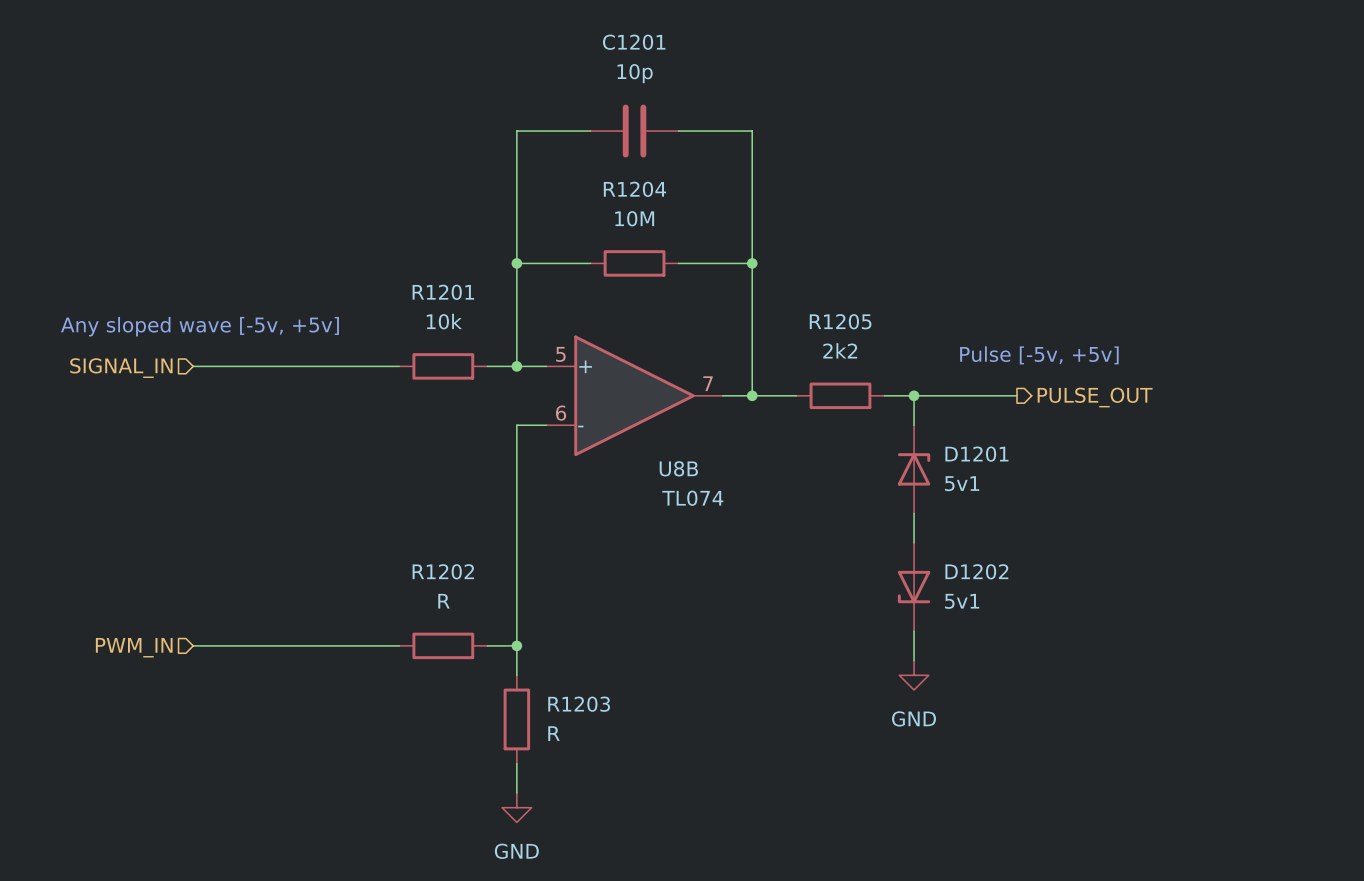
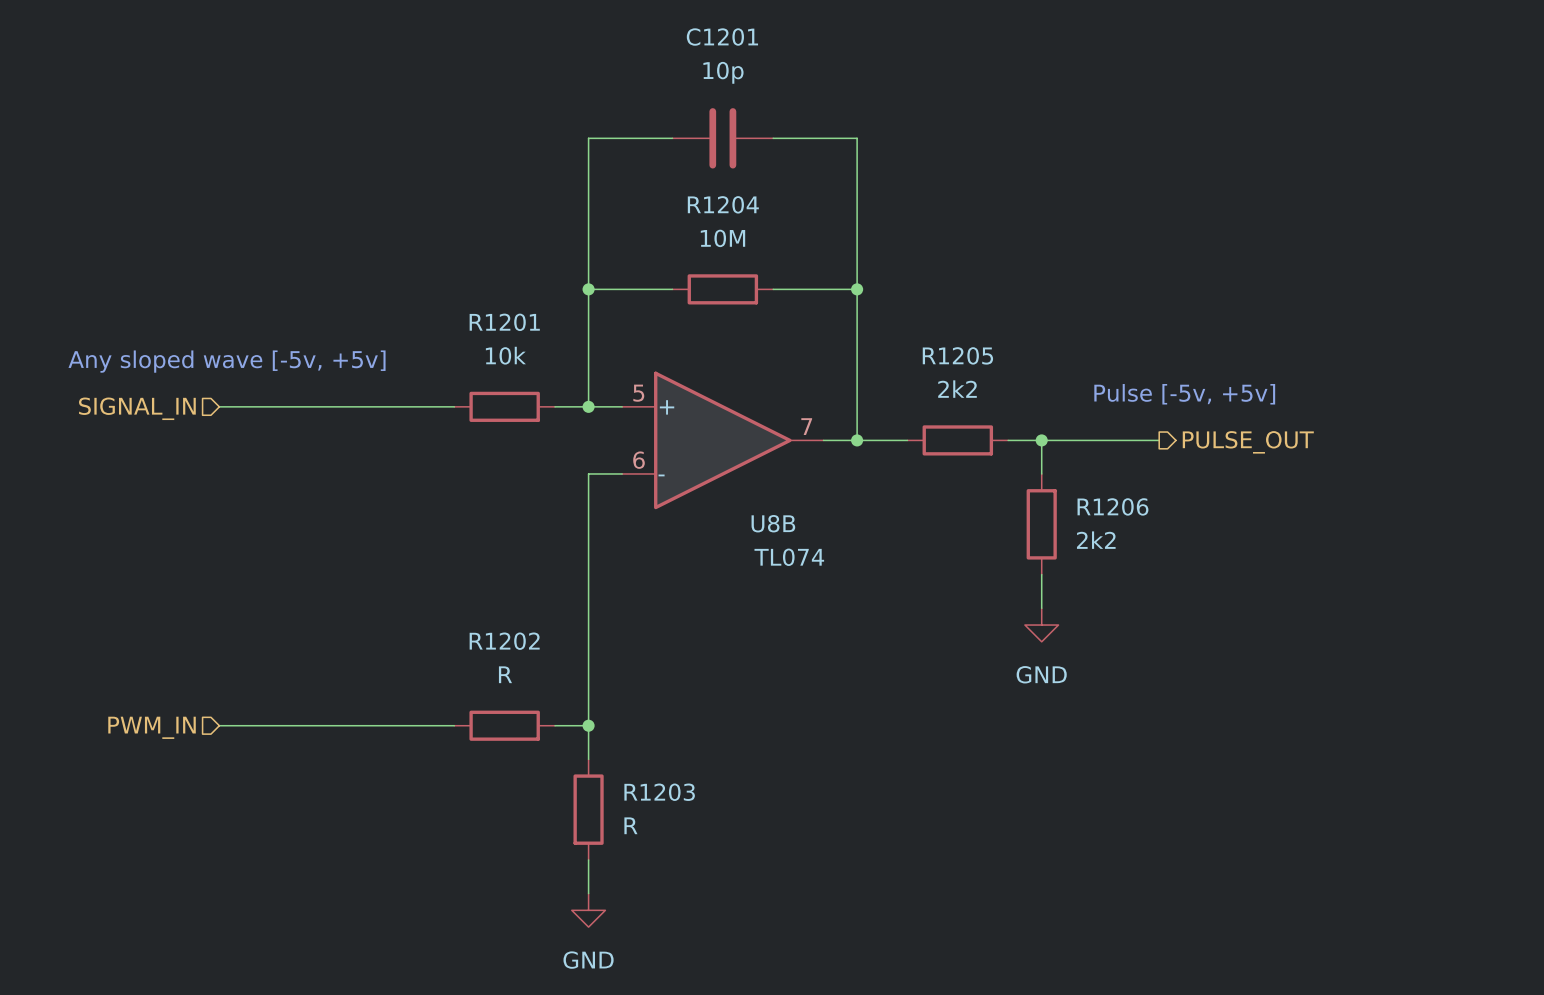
D1201: 5v1 (914, 469) -> none
R1206: none -> 2k2 (1041, 524)
D1202: 5v1 (914, 587) -> none
wire: (914, 631) (914, 660) -> none
power symbol position: GND (914, 675) -> GND (1041, 625)

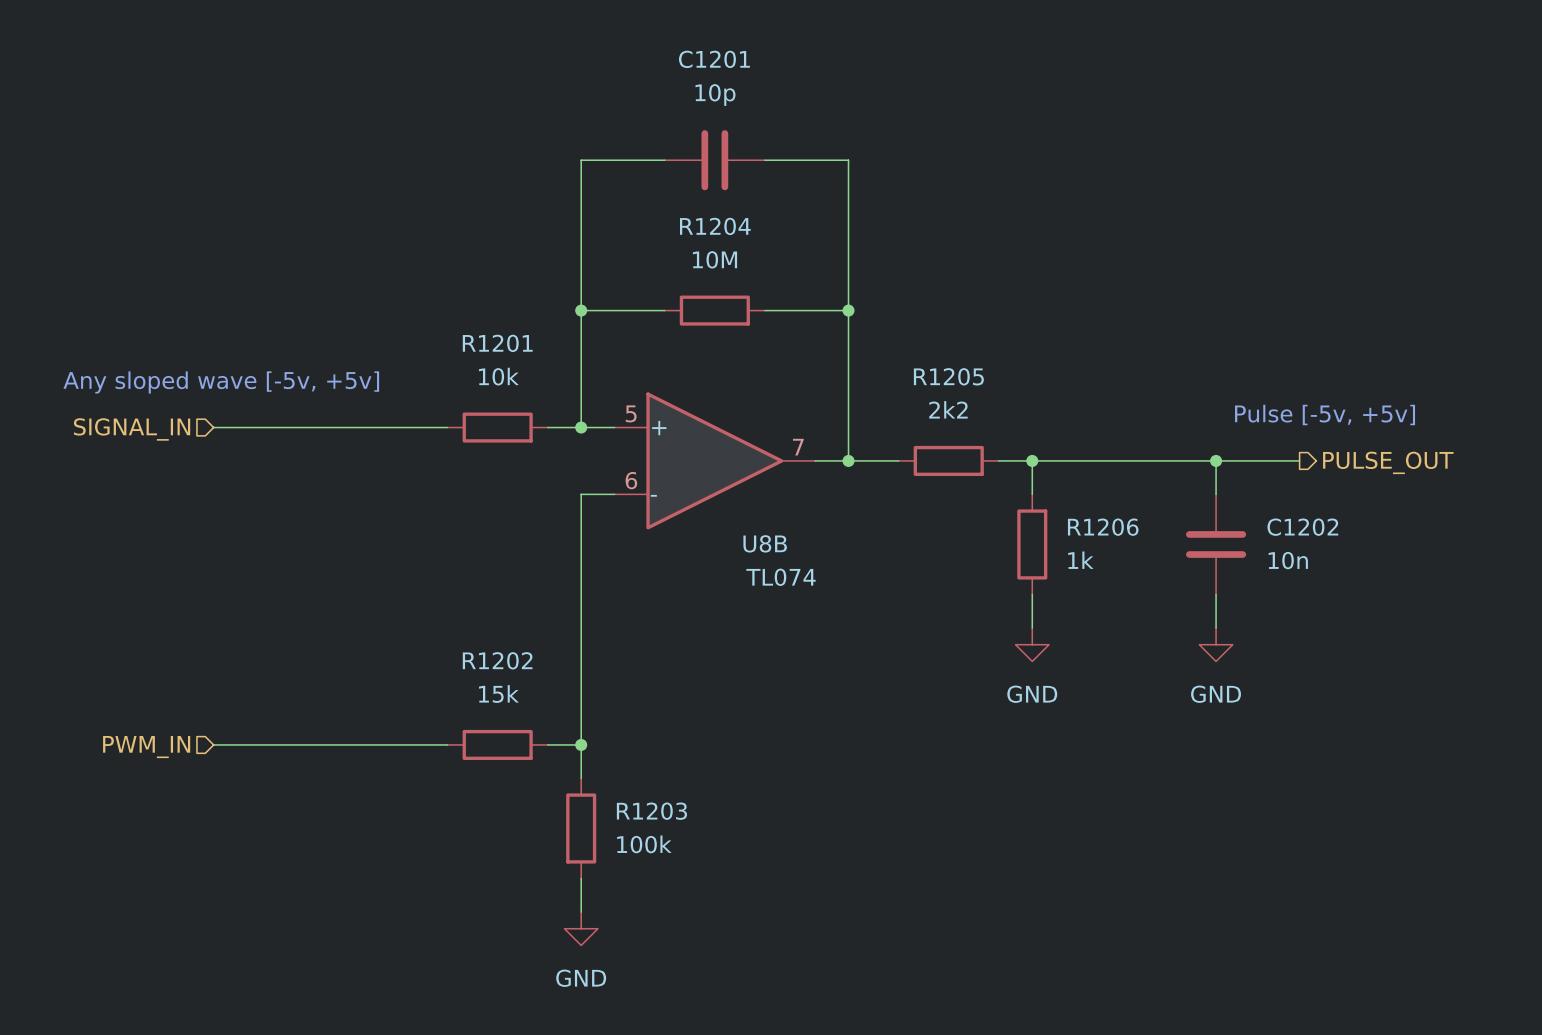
text position: Pulse [-5v, +5v] (1184, 394) -> Pulse [-5v, +5v] (1325, 415)
wire: none -> (1149, 460) (1299, 460)
wire: none -> (1216, 460) (1216, 494)
junction: none -> (1216, 460)
hierarchical label position: PULSE_OUT (1248, 442) -> PULSE_OUT (1388, 462)
C1202: none -> 10n (1216, 544)
R1206 value: 2k2 (1096, 540) -> 1k (1080, 560)
wire: none -> (1216, 594) (1216, 628)
power symbol: none -> GND (1216, 644)
R1202 value: R (505, 674) -> 15k (498, 694)
R1203 value: R (630, 825) -> 100k (644, 844)

